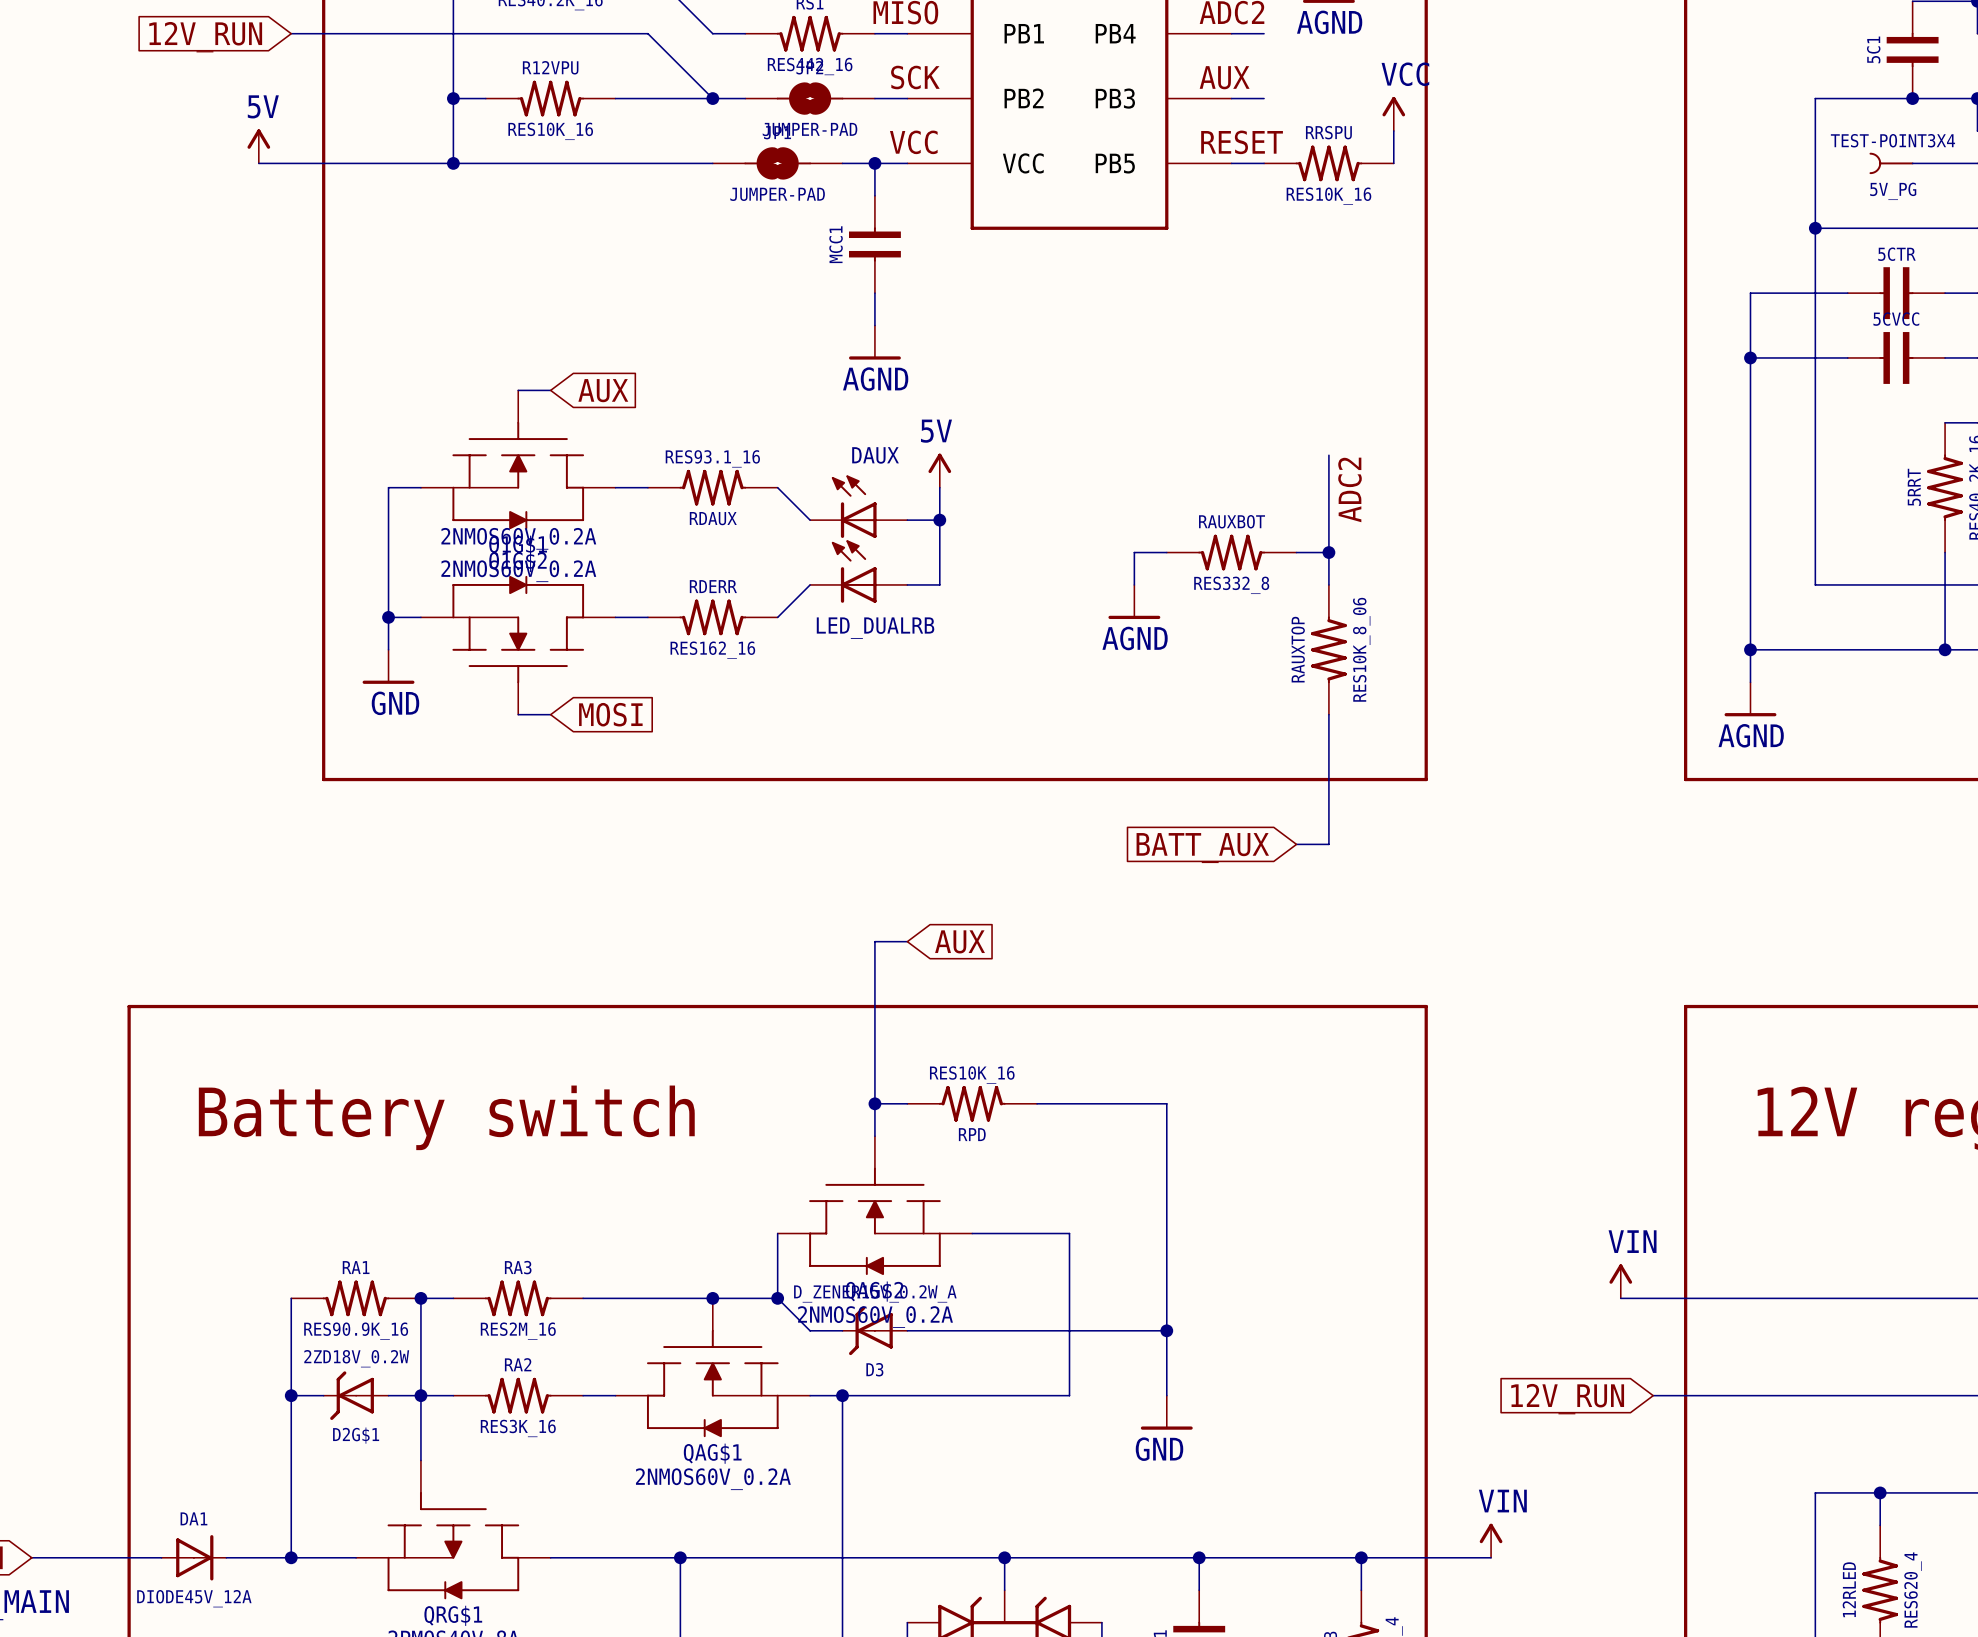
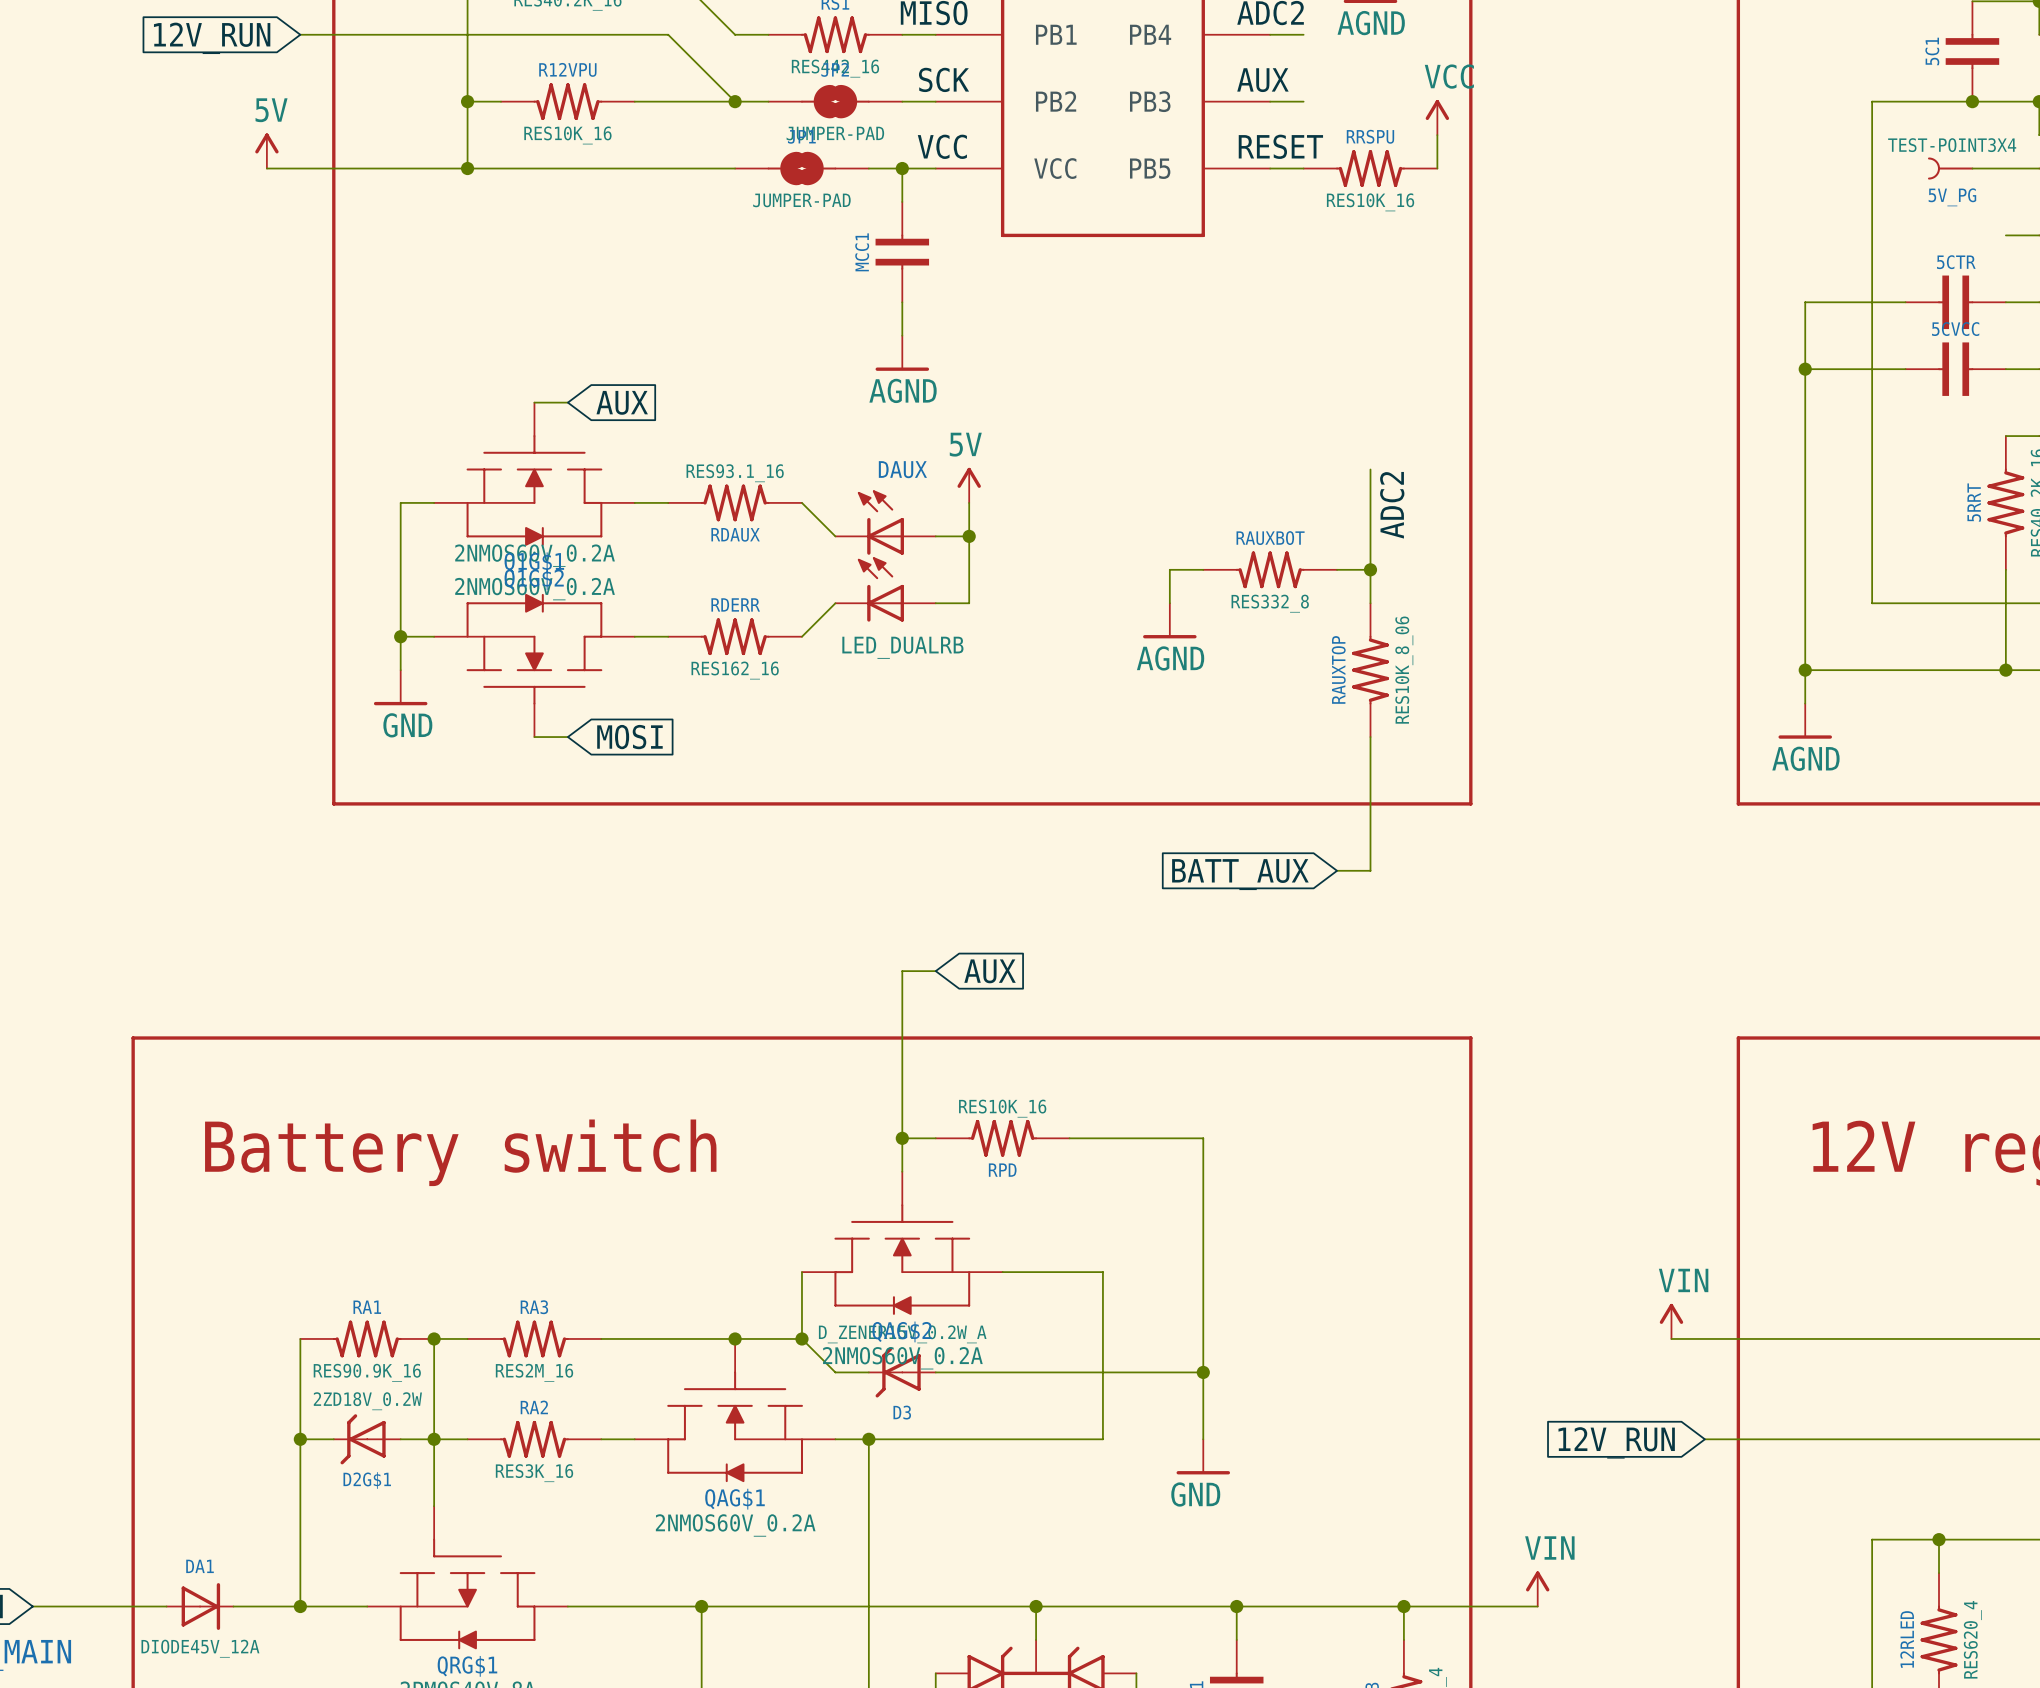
wire: (1815, 228) (1945, 228) -> none
junction: (1815, 228) -> none

